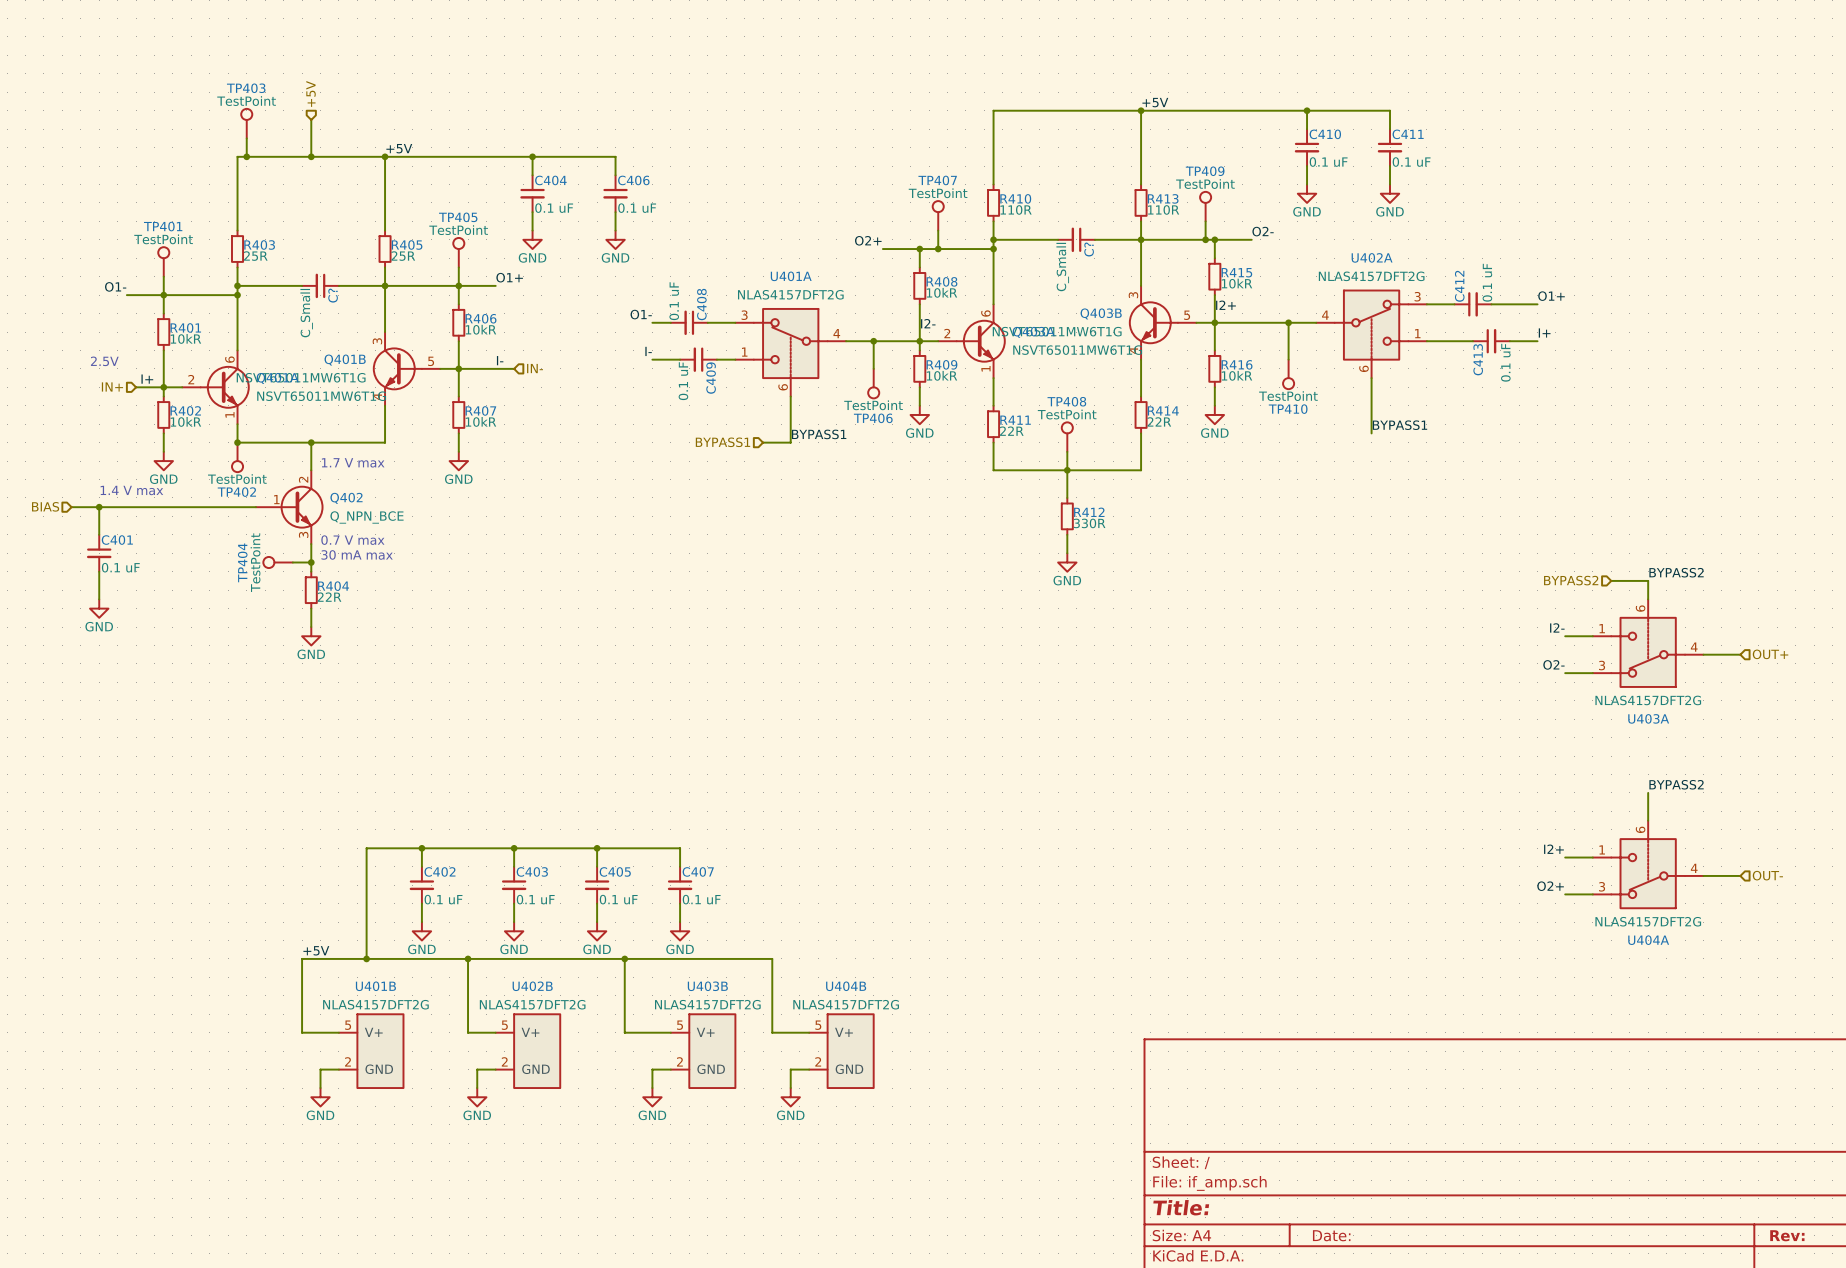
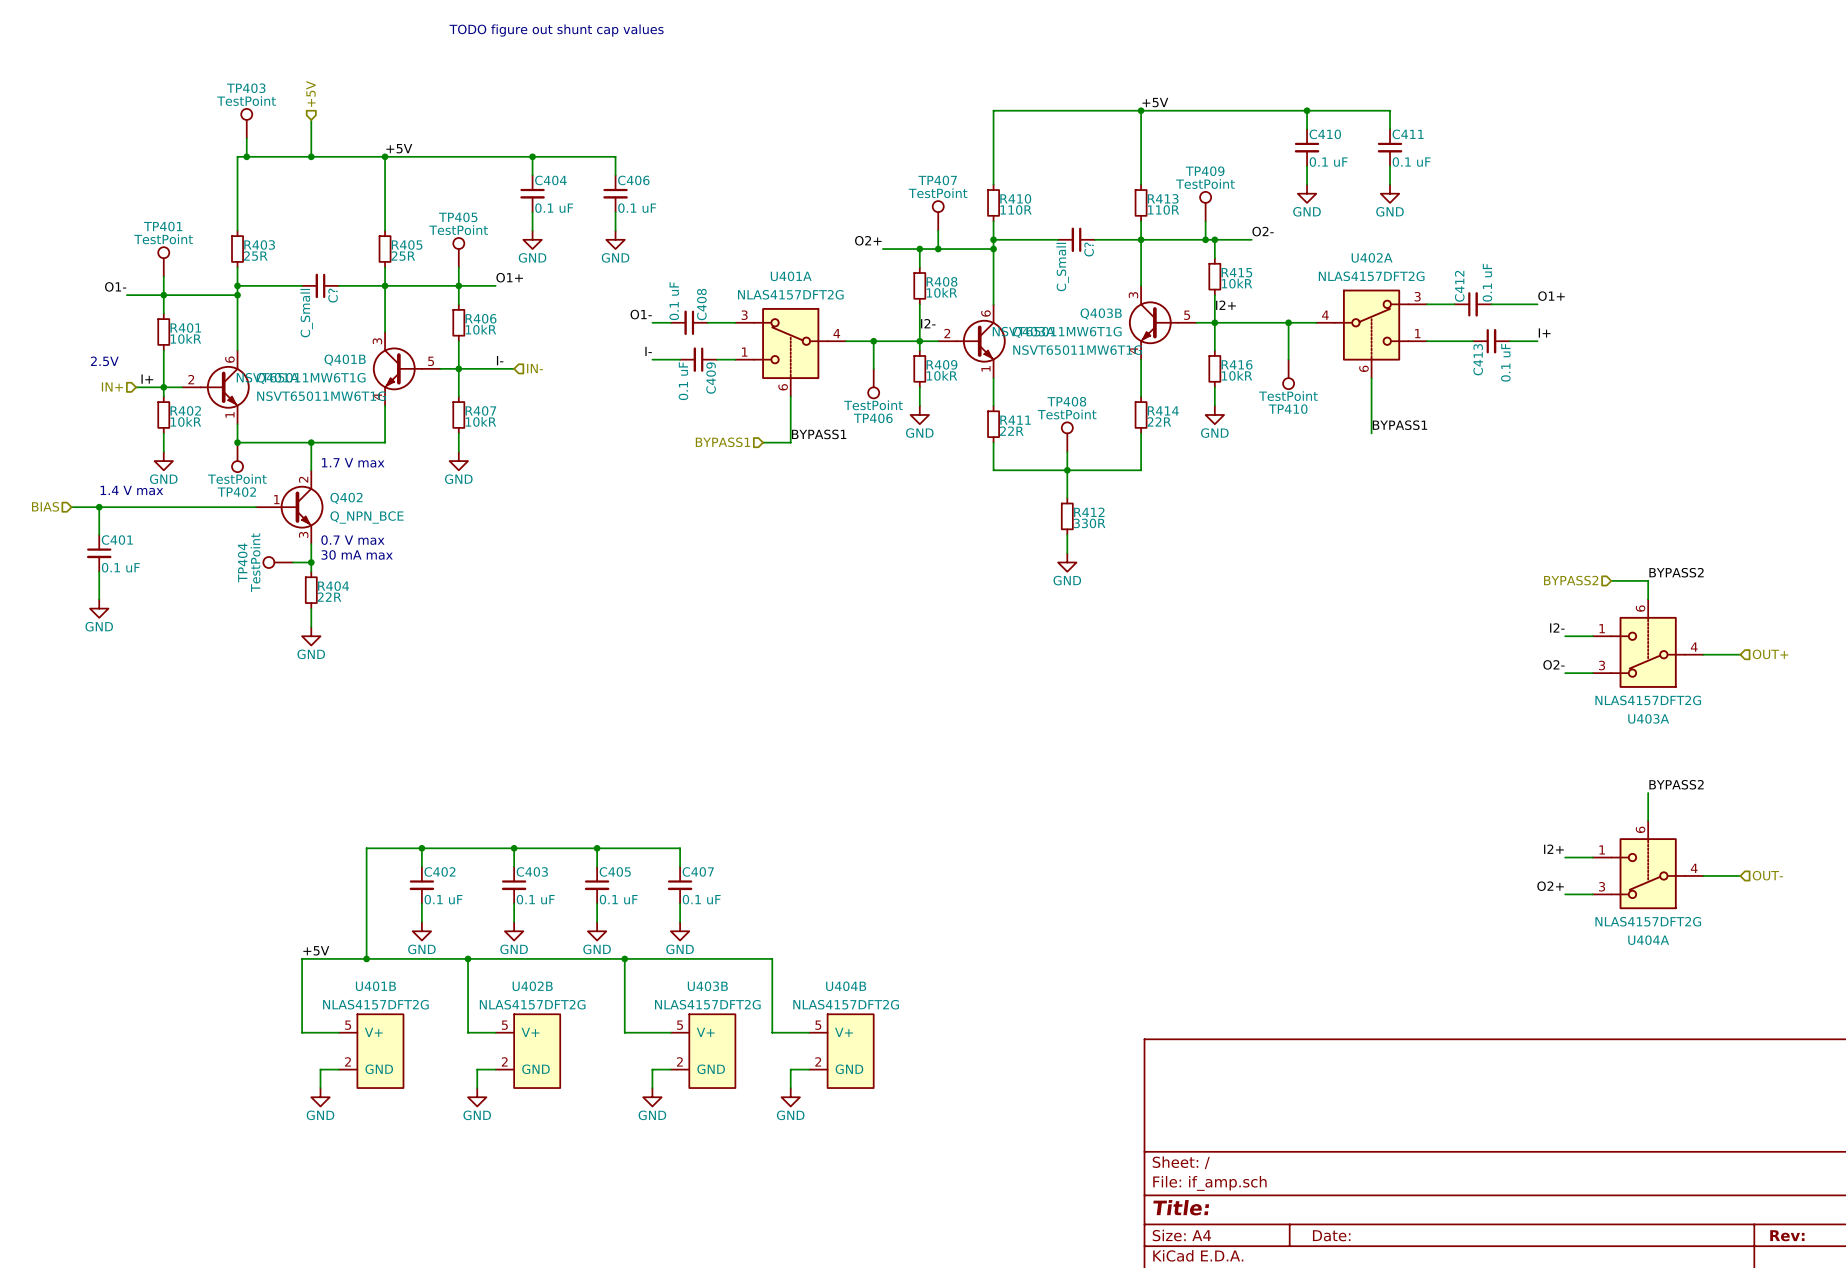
text: none -> TODO figure out shunt cap values (556, 30)

